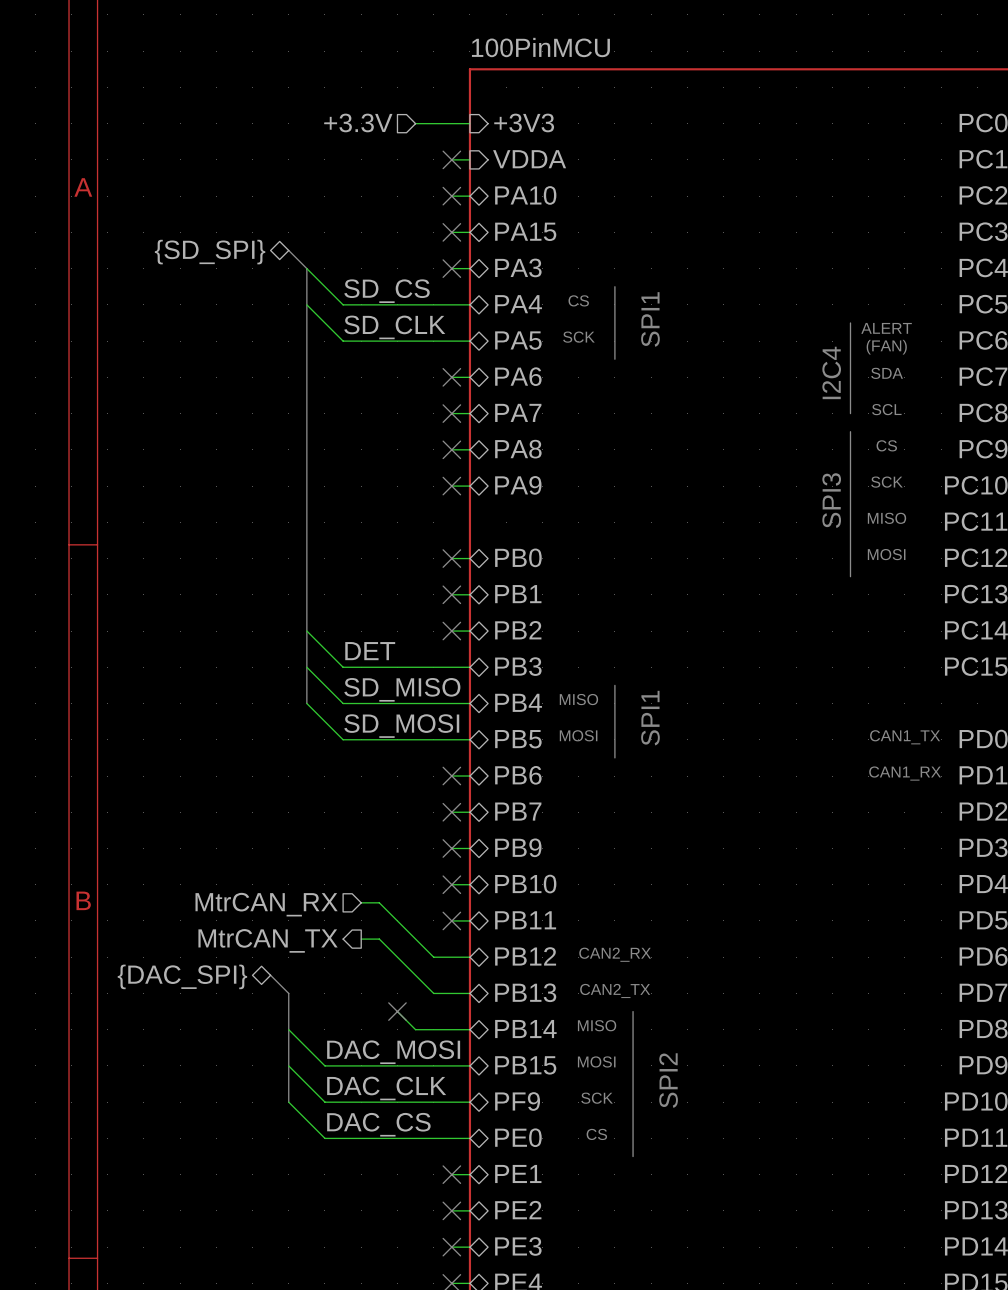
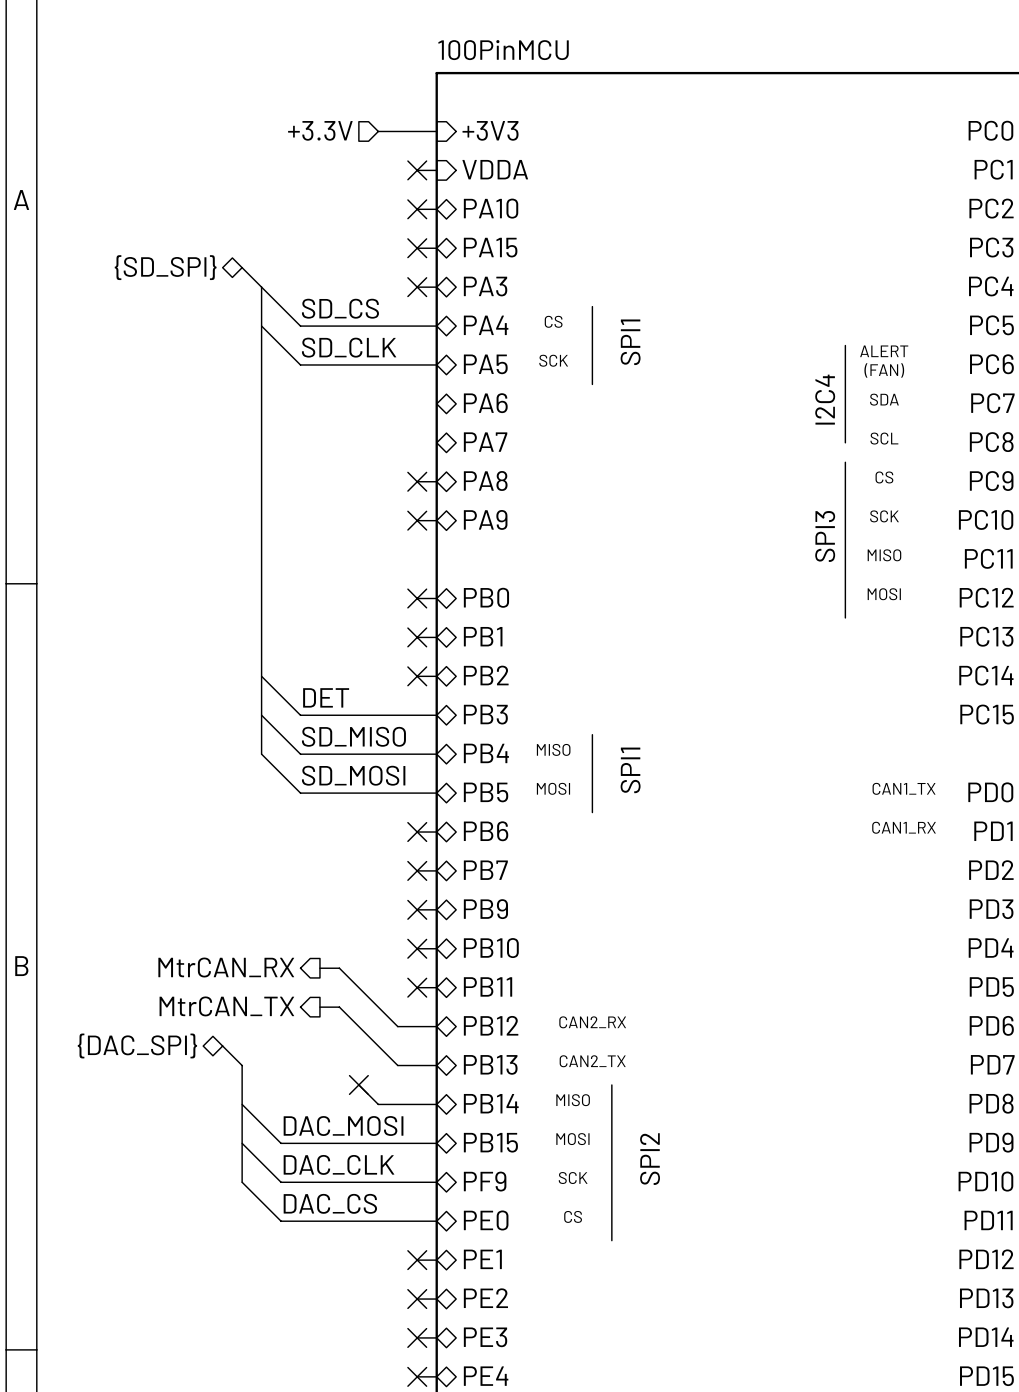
wire: (451, 377) (469, 377) -> none
no-connect mark: (451, 377) -> none
wire: (451, 413) (469, 413) -> none
no-connect mark: (451, 413) -> none
hierarchical label shape: input (266, 904) -> output (226, 967)

